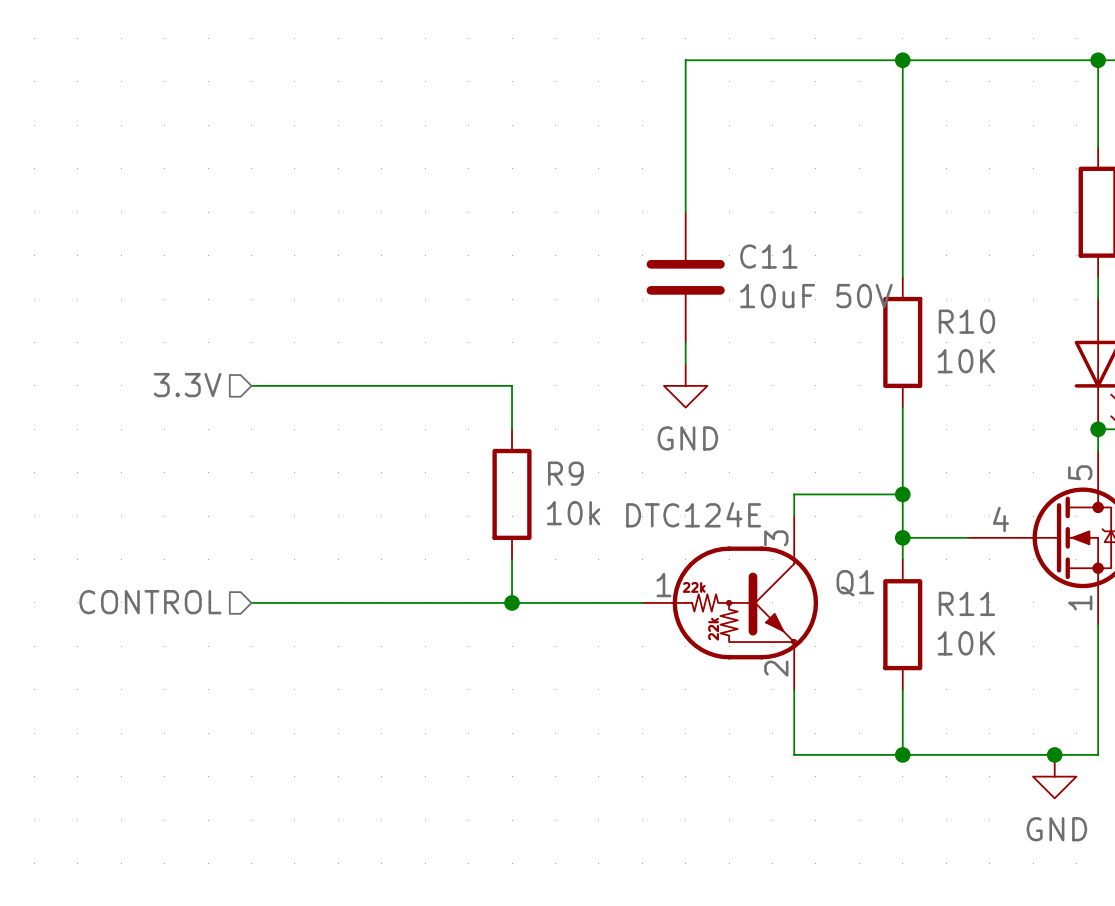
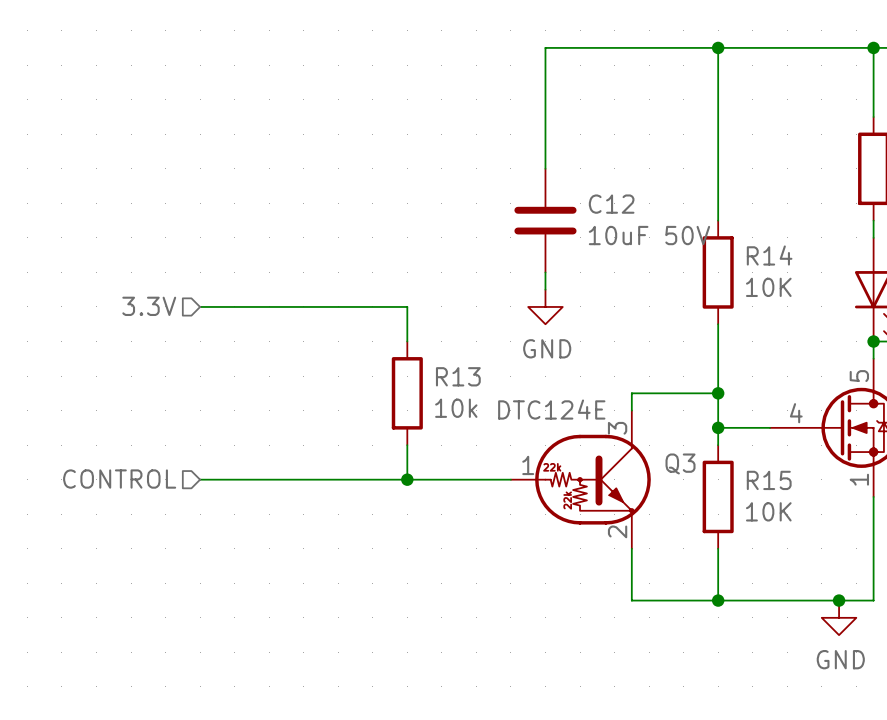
C11 name: C11 (768, 256) -> C12 (611, 204)
R10 name: R10 (966, 321) -> R14 (769, 255)
R9 name: R9 (565, 473) -> R13 (458, 376)
Q1 name: Q1 (855, 583) -> Q3 (680, 463)
R11 name: R11 (966, 603) -> R15 (769, 480)

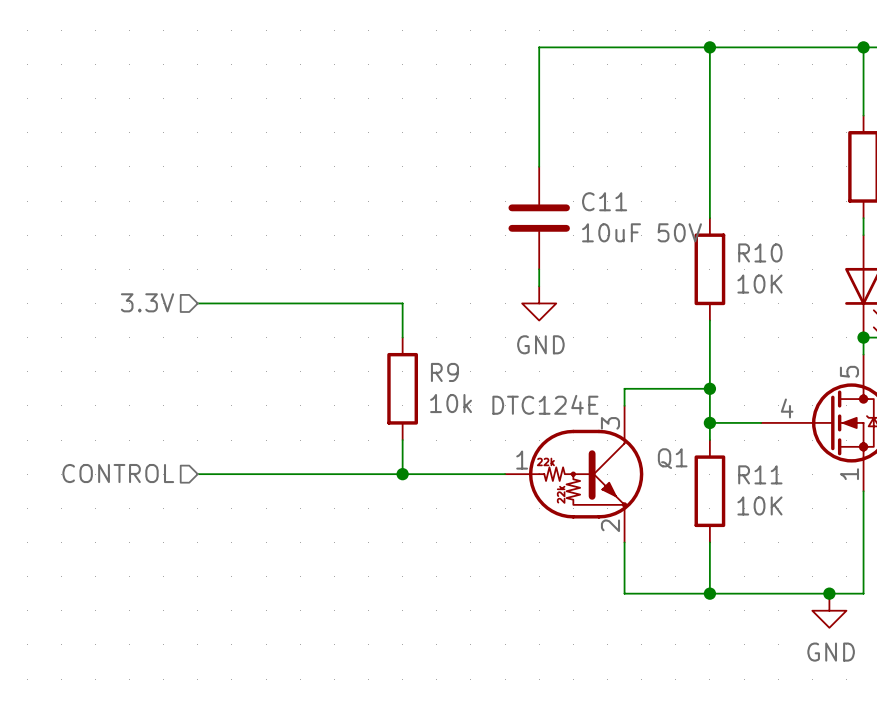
C12 name: C12 (611, 204) -> C11 (604, 201)
R14 name: R14 (769, 255) -> R10 (760, 252)
R13 name: R13 (458, 376) -> R9 (444, 372)
Q3 name: Q3 (680, 463) -> Q1 (672, 458)
R15 name: R15 (769, 480) -> R11 (760, 474)

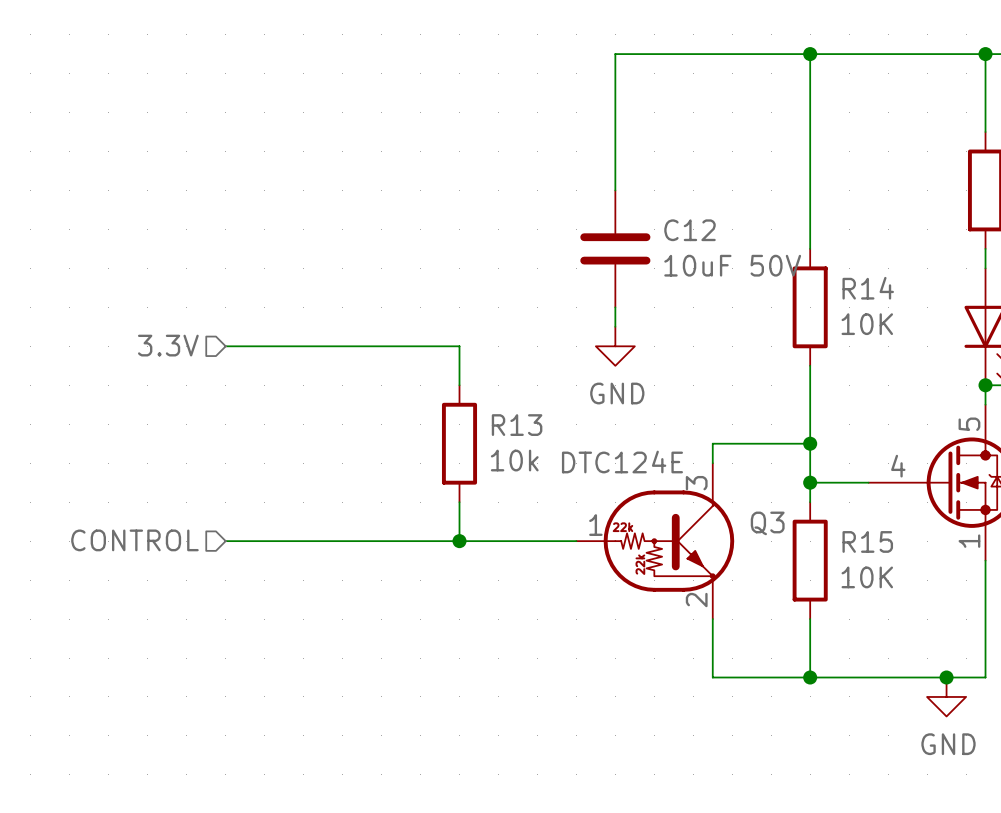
C11 name: C11 (604, 201) -> C12 (690, 230)
R10 name: R10 (760, 252) -> R14 (868, 288)
R9 name: R9 (444, 372) -> R13 (517, 425)
Q1 name: Q1 (672, 458) -> Q3 (767, 523)
R11 name: R11 (760, 474) -> R15 (867, 541)

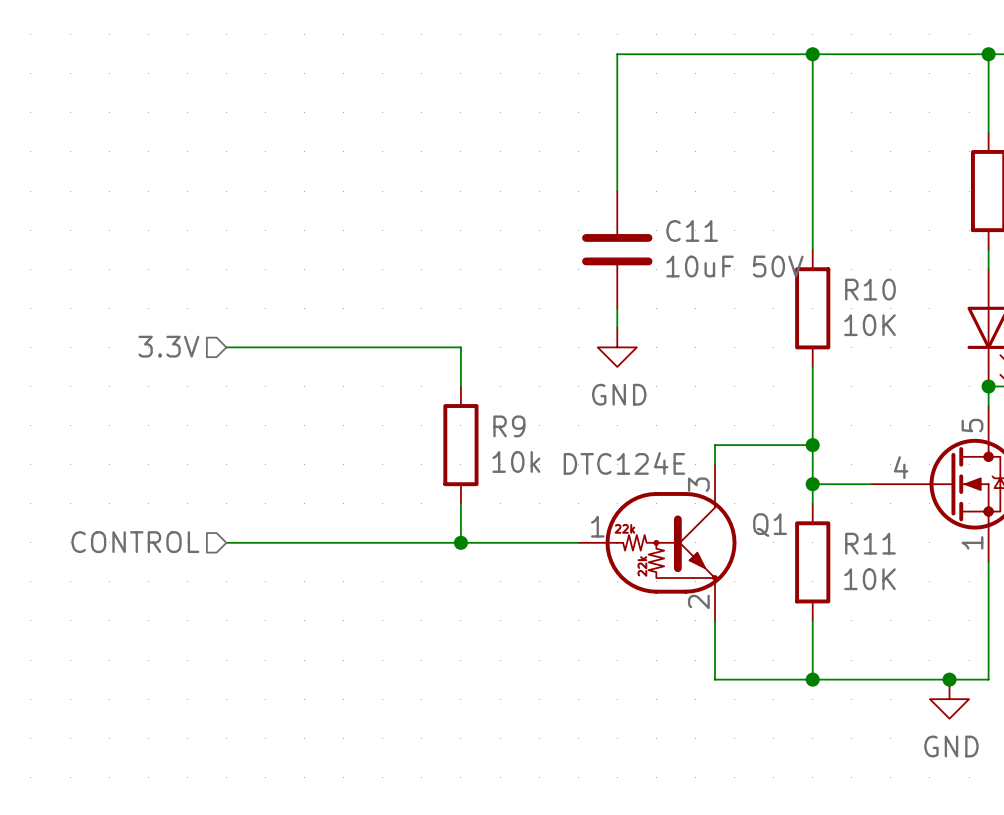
C12 name: C12 (690, 230) -> C11 (692, 230)
R14 name: R14 (868, 288) -> R10 (870, 289)
R13 name: R13 (517, 425) -> R9 (509, 426)
Q3 name: Q3 (767, 523) -> Q1 (770, 525)
R15 name: R15 (867, 541) -> R11 (870, 543)

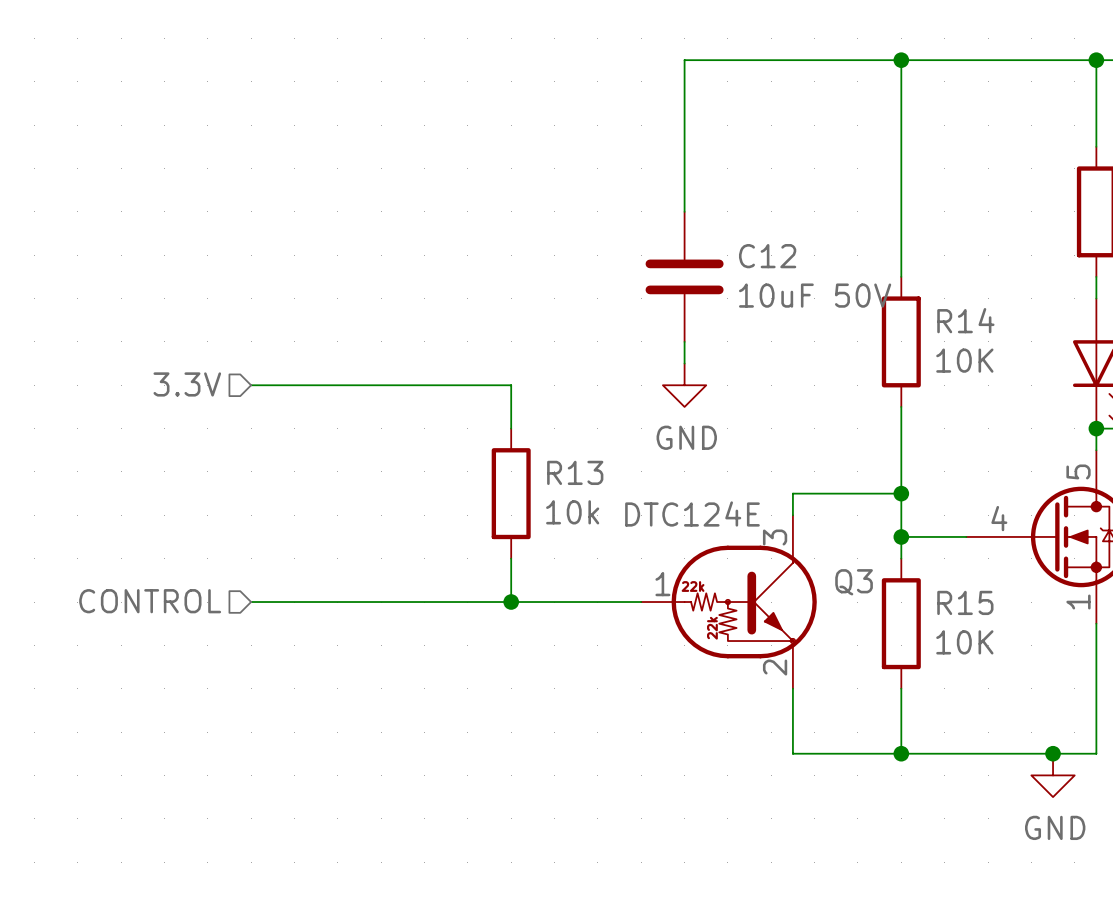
C11 name: C11 (692, 230) -> C12 (767, 256)
R10 name: R10 (870, 289) -> R14 (965, 320)
R9 name: R9 (509, 426) -> R13 (575, 472)
Q1 name: Q1 (770, 525) -> Q3 (854, 582)
R11 name: R11 (870, 543) -> R15 (965, 602)

